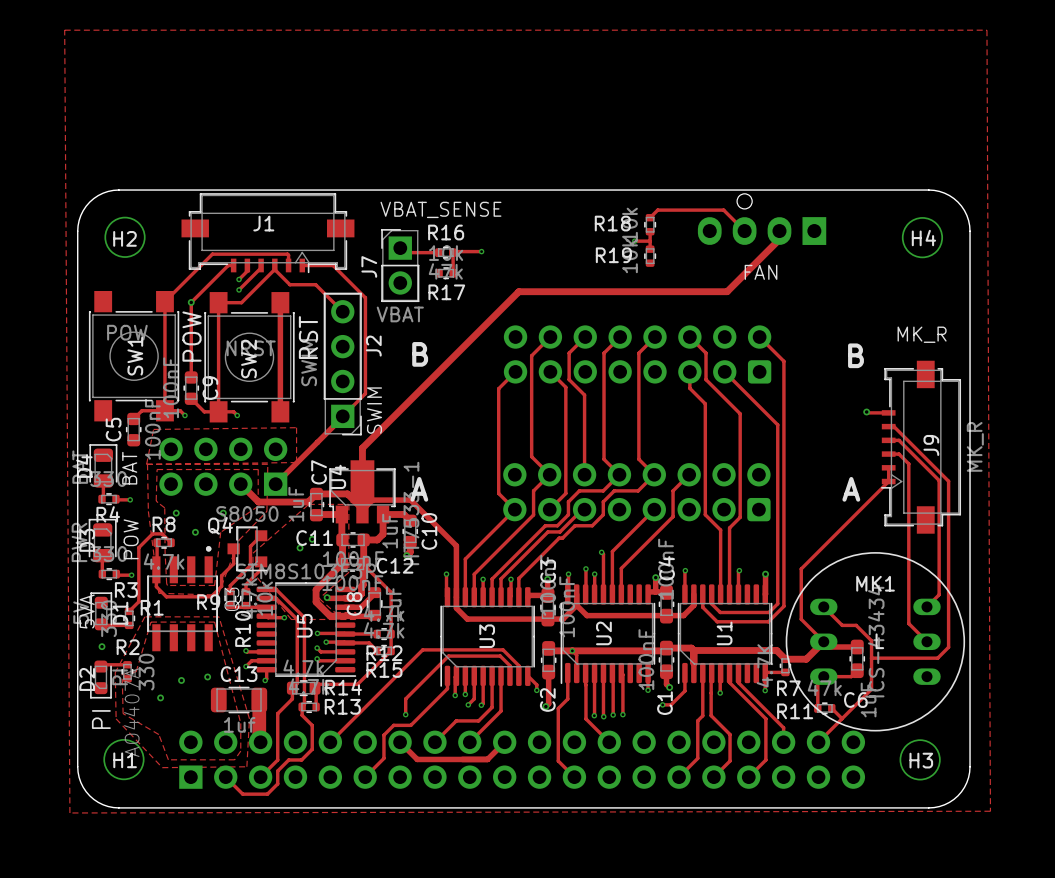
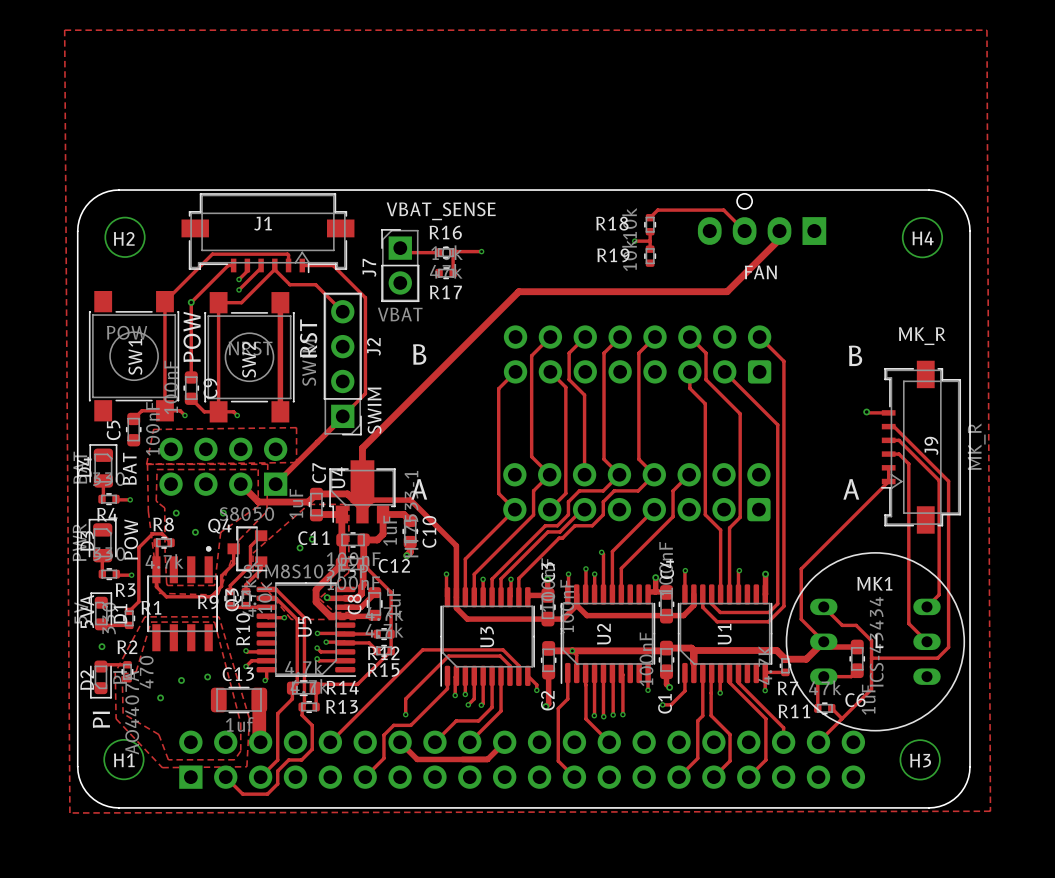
R2 value: 330 (146, 672) -> 470 (146, 672)

